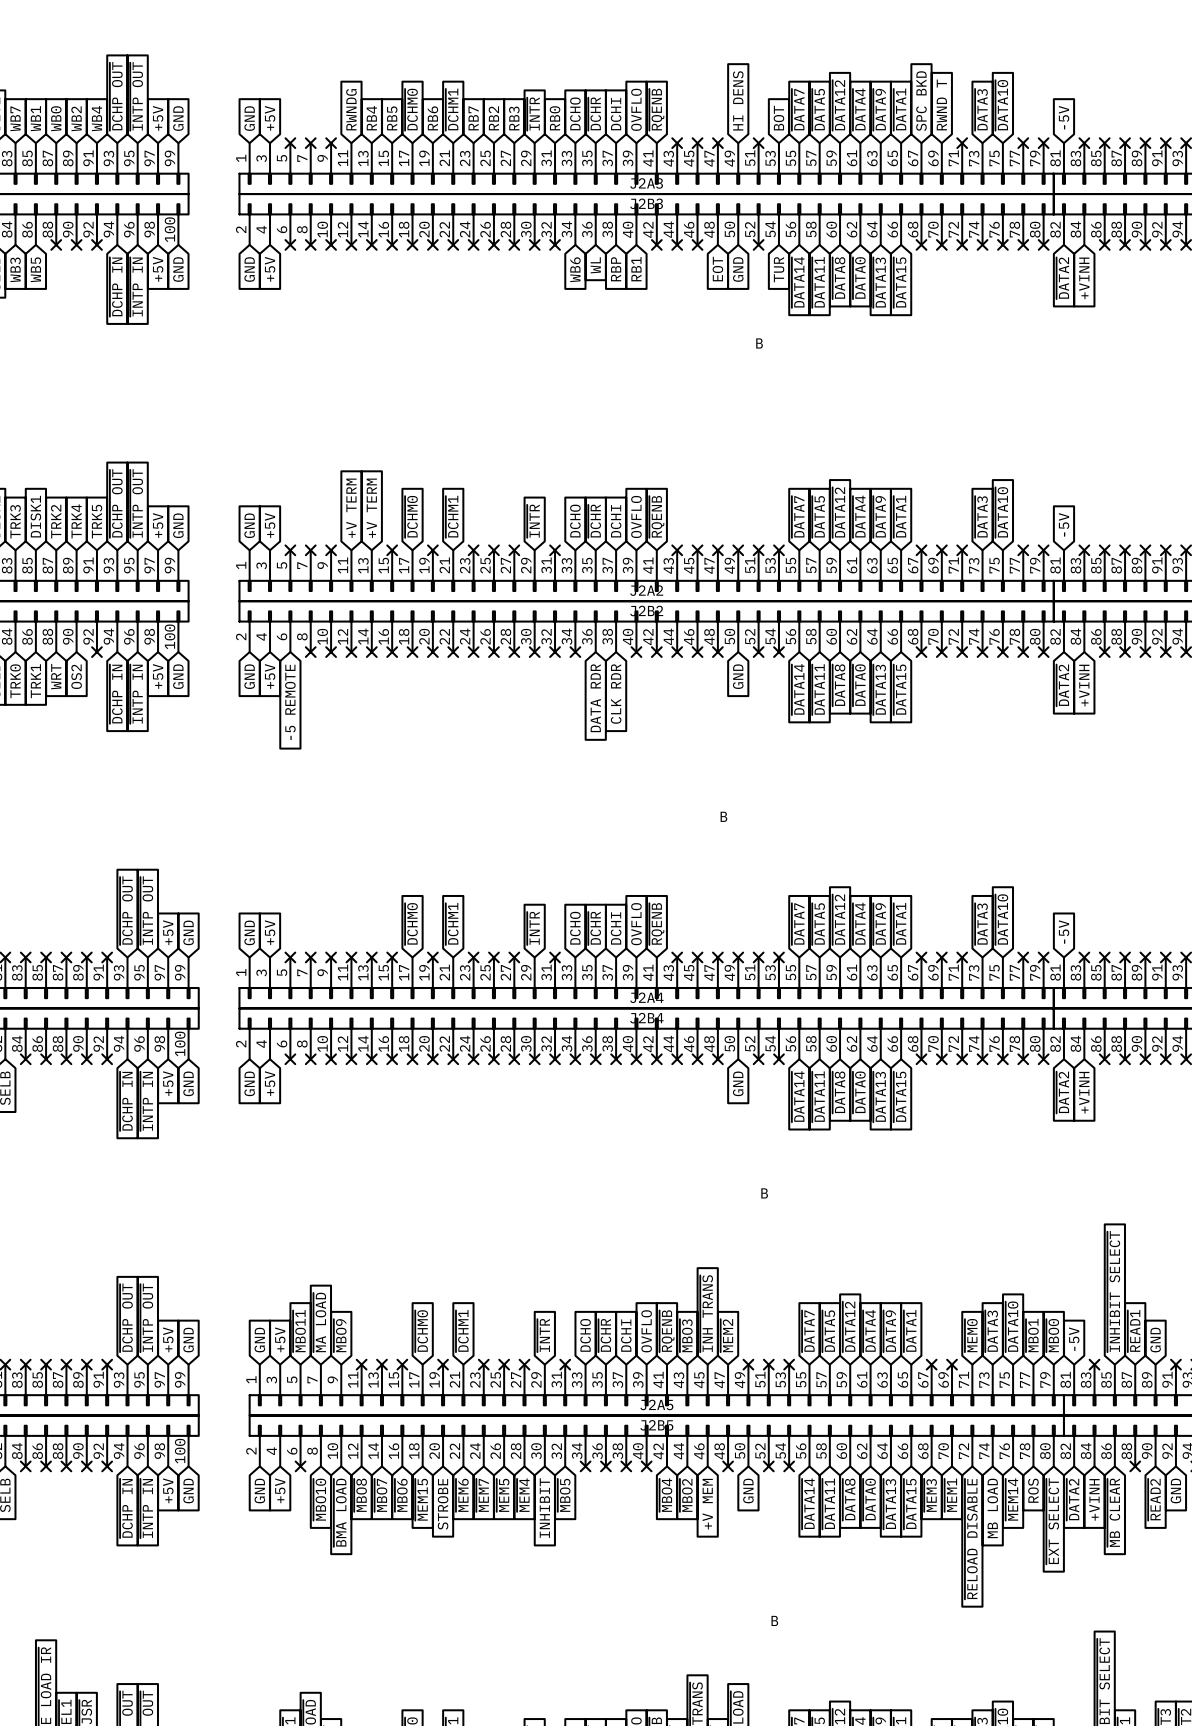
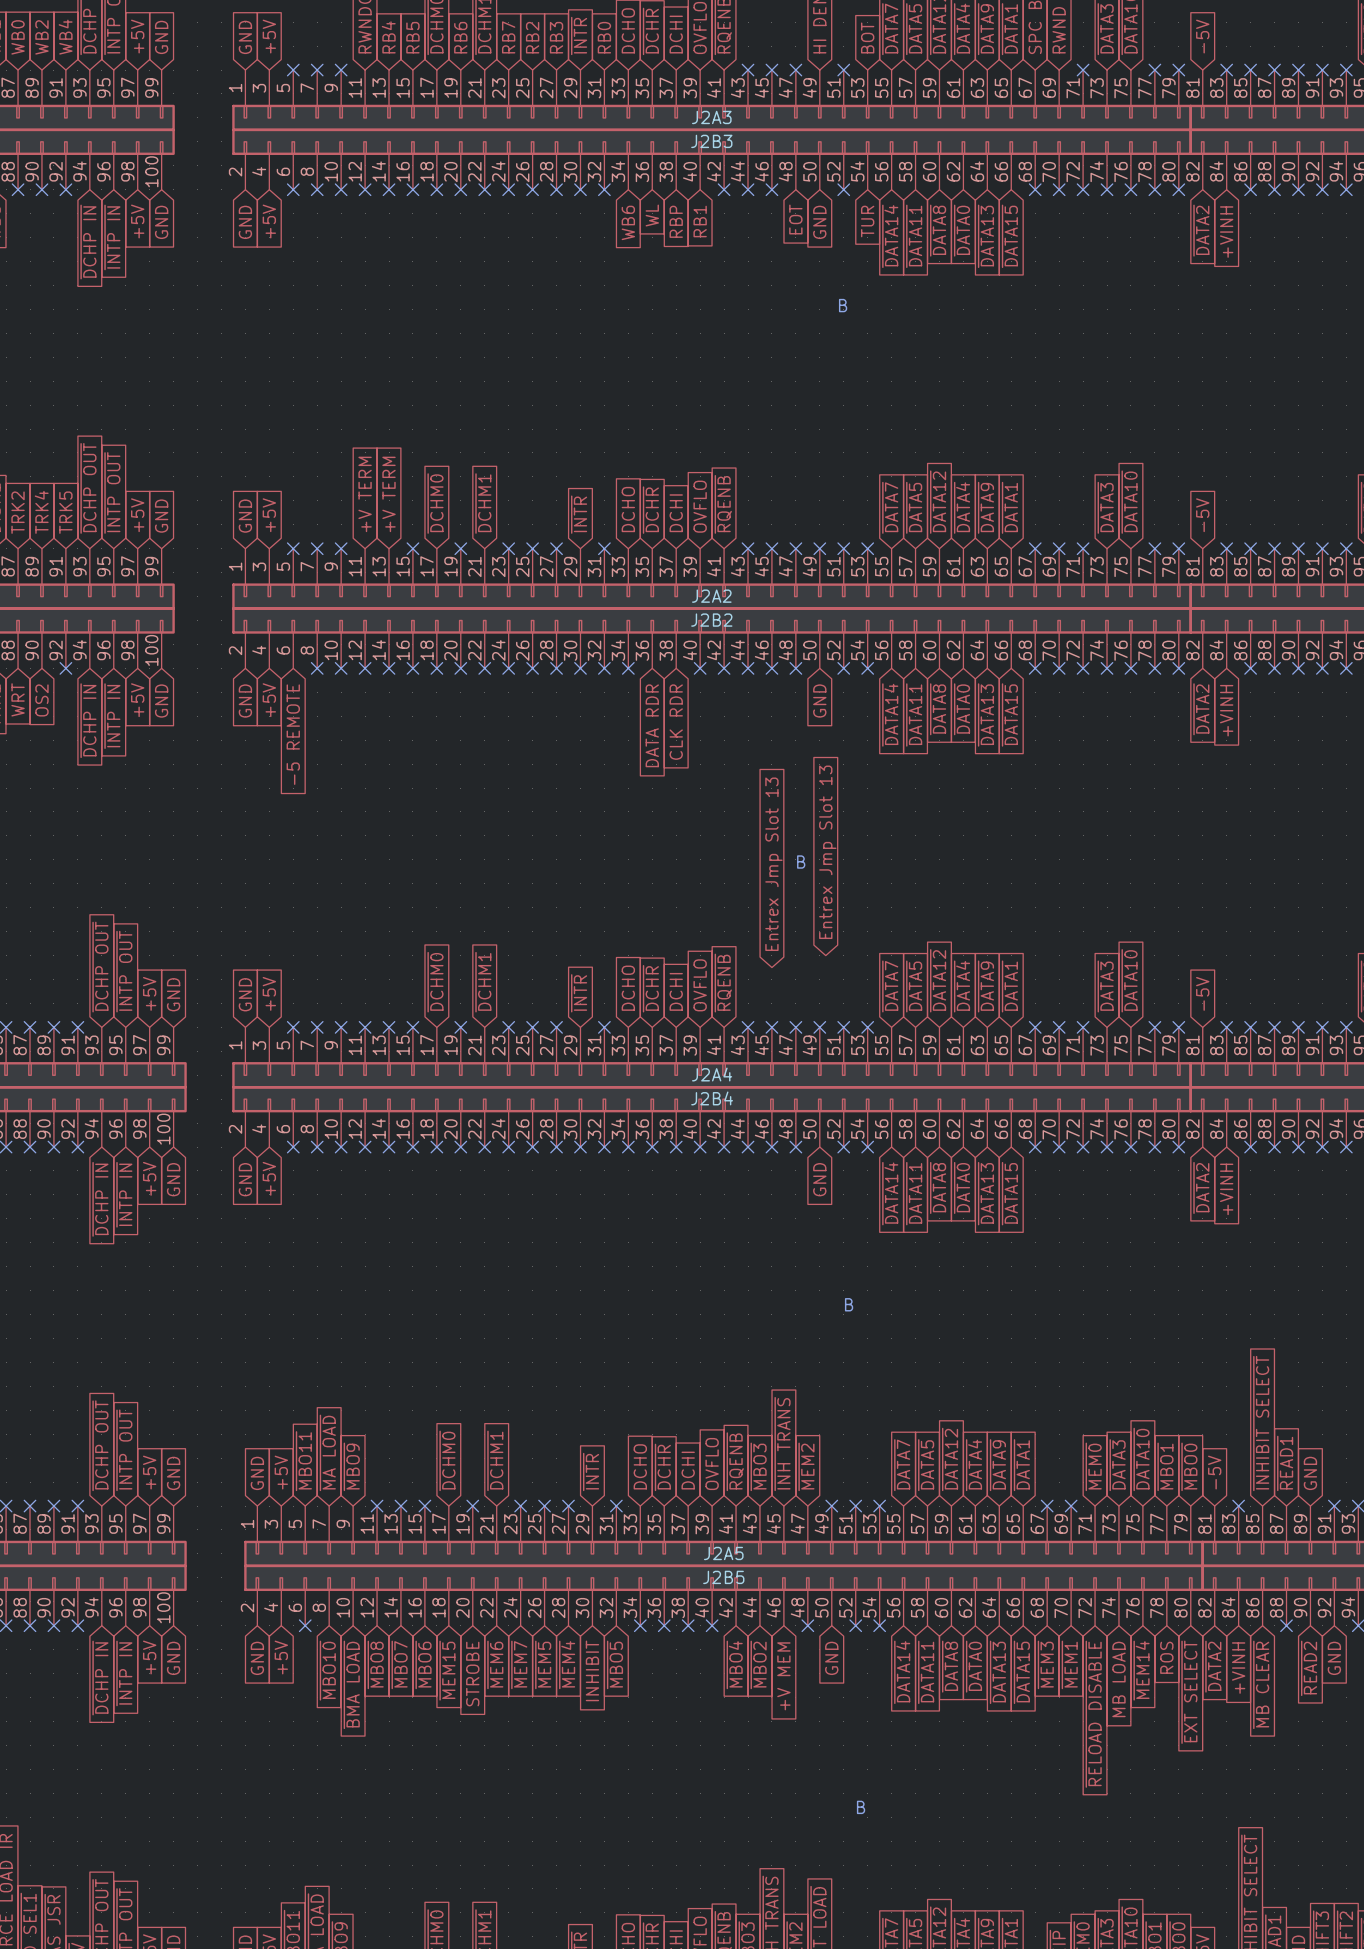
global label: none -> Entrex Jmp Slot 13 (827, 852)
global label: none -> Entrex Jmp Slot 13 (773, 864)

